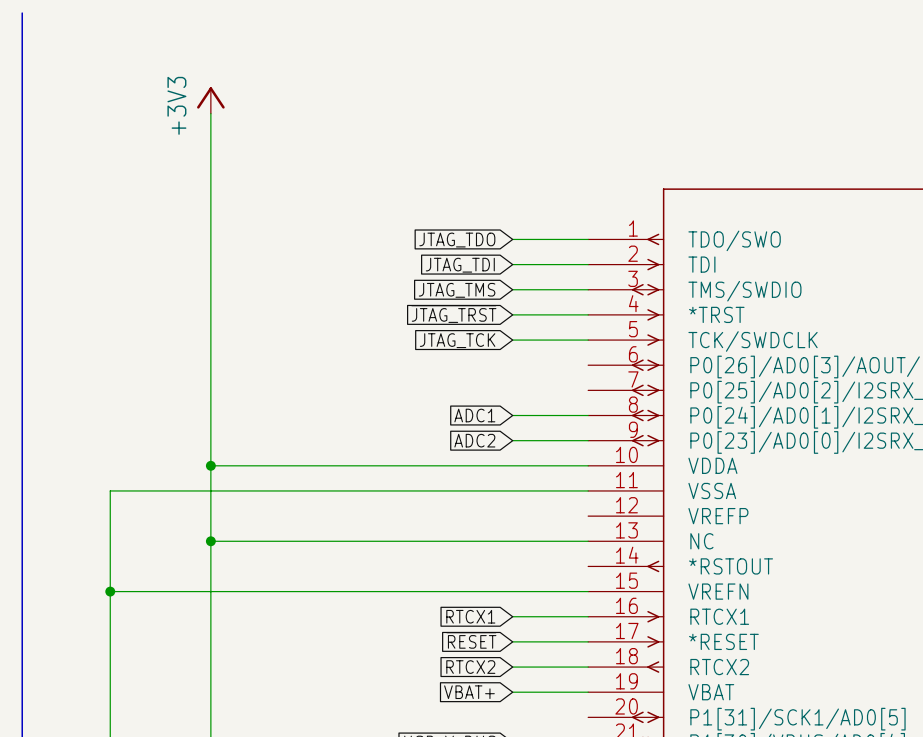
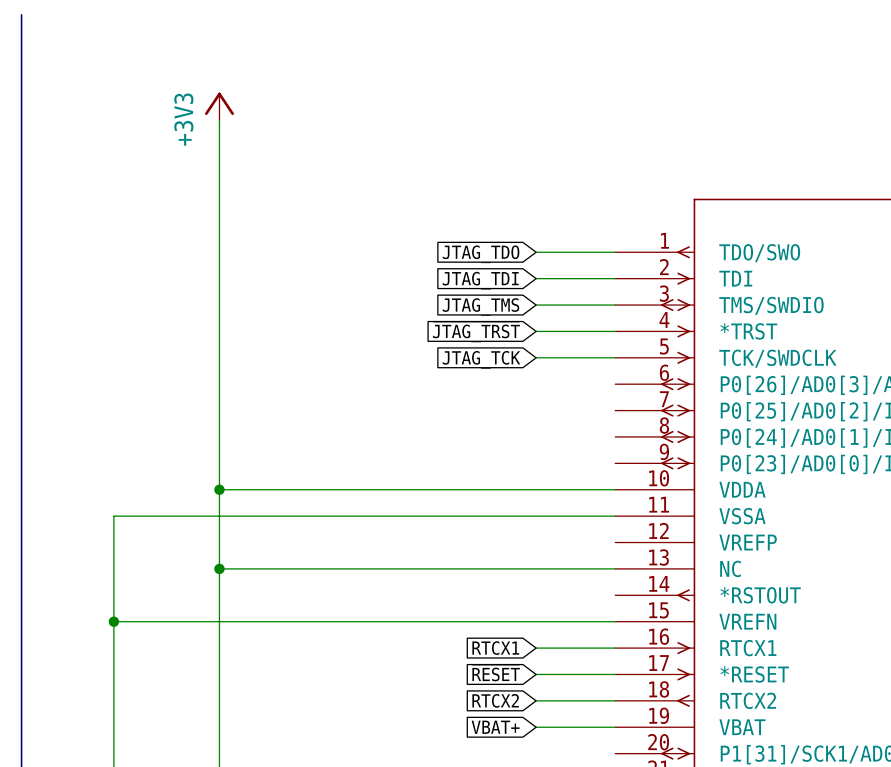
global label: ADC1 (474, 415) -> none
wire: (512, 415) (588, 415) -> none
global label: ADC2 (474, 440) -> none
wire: (512, 440) (588, 440) -> none

